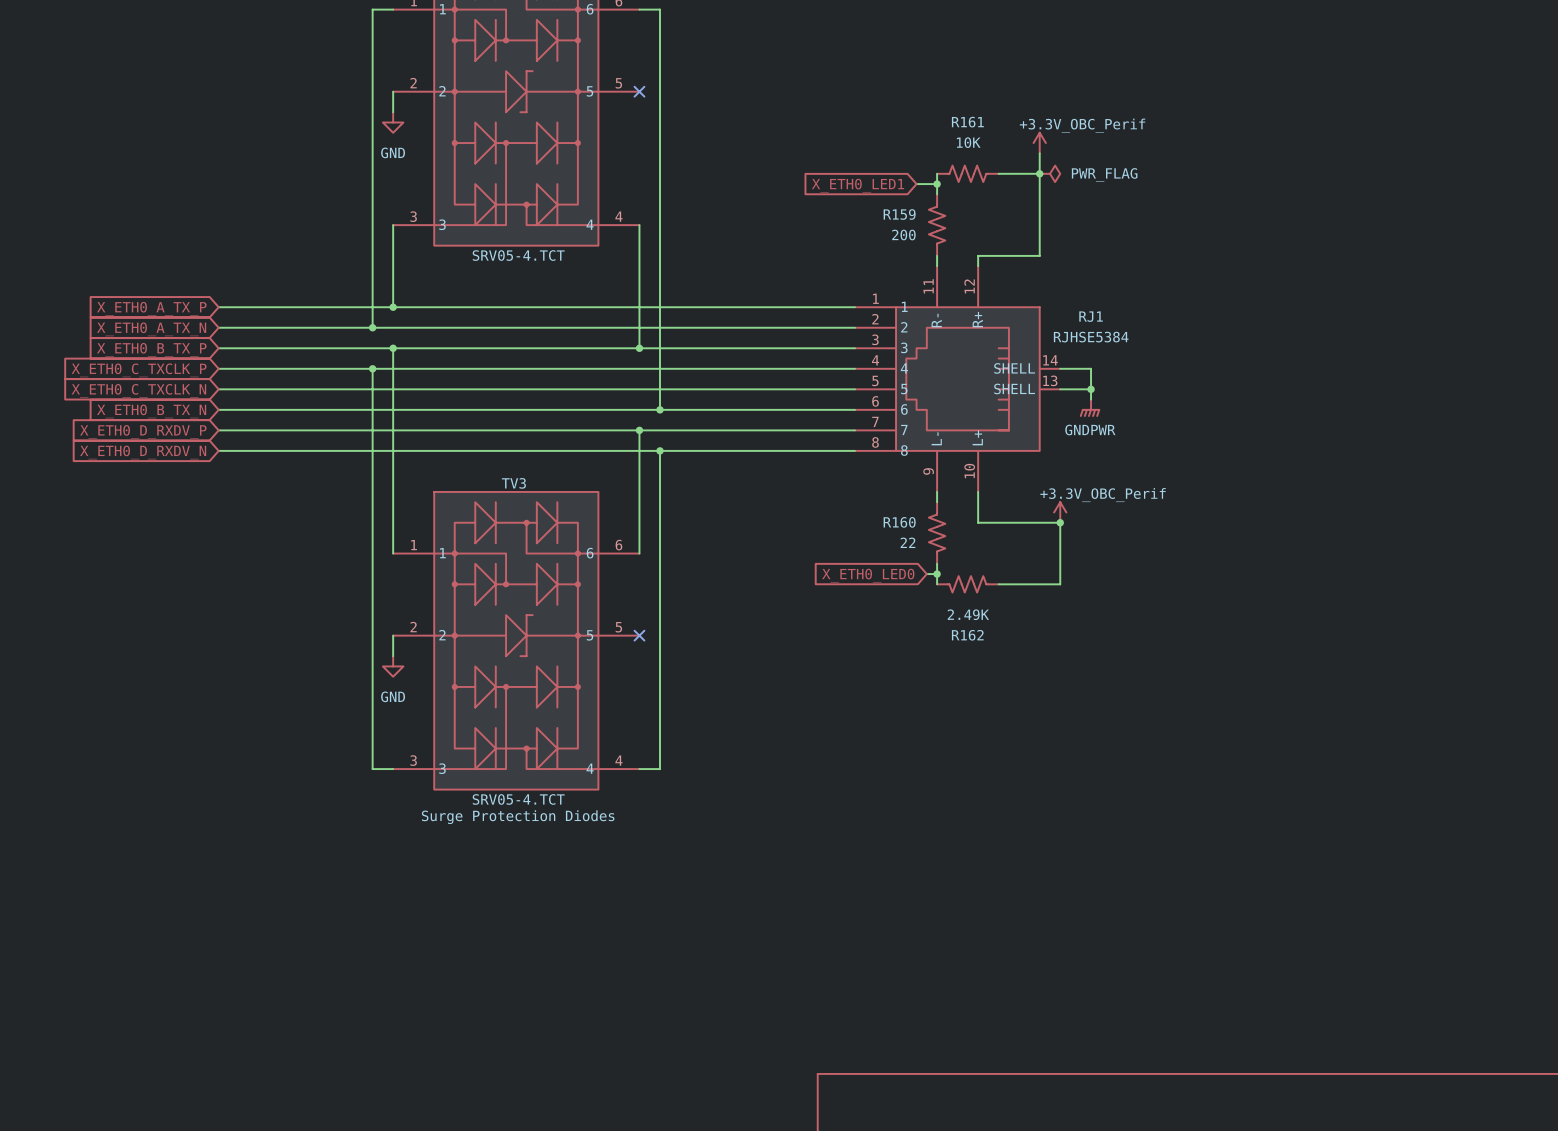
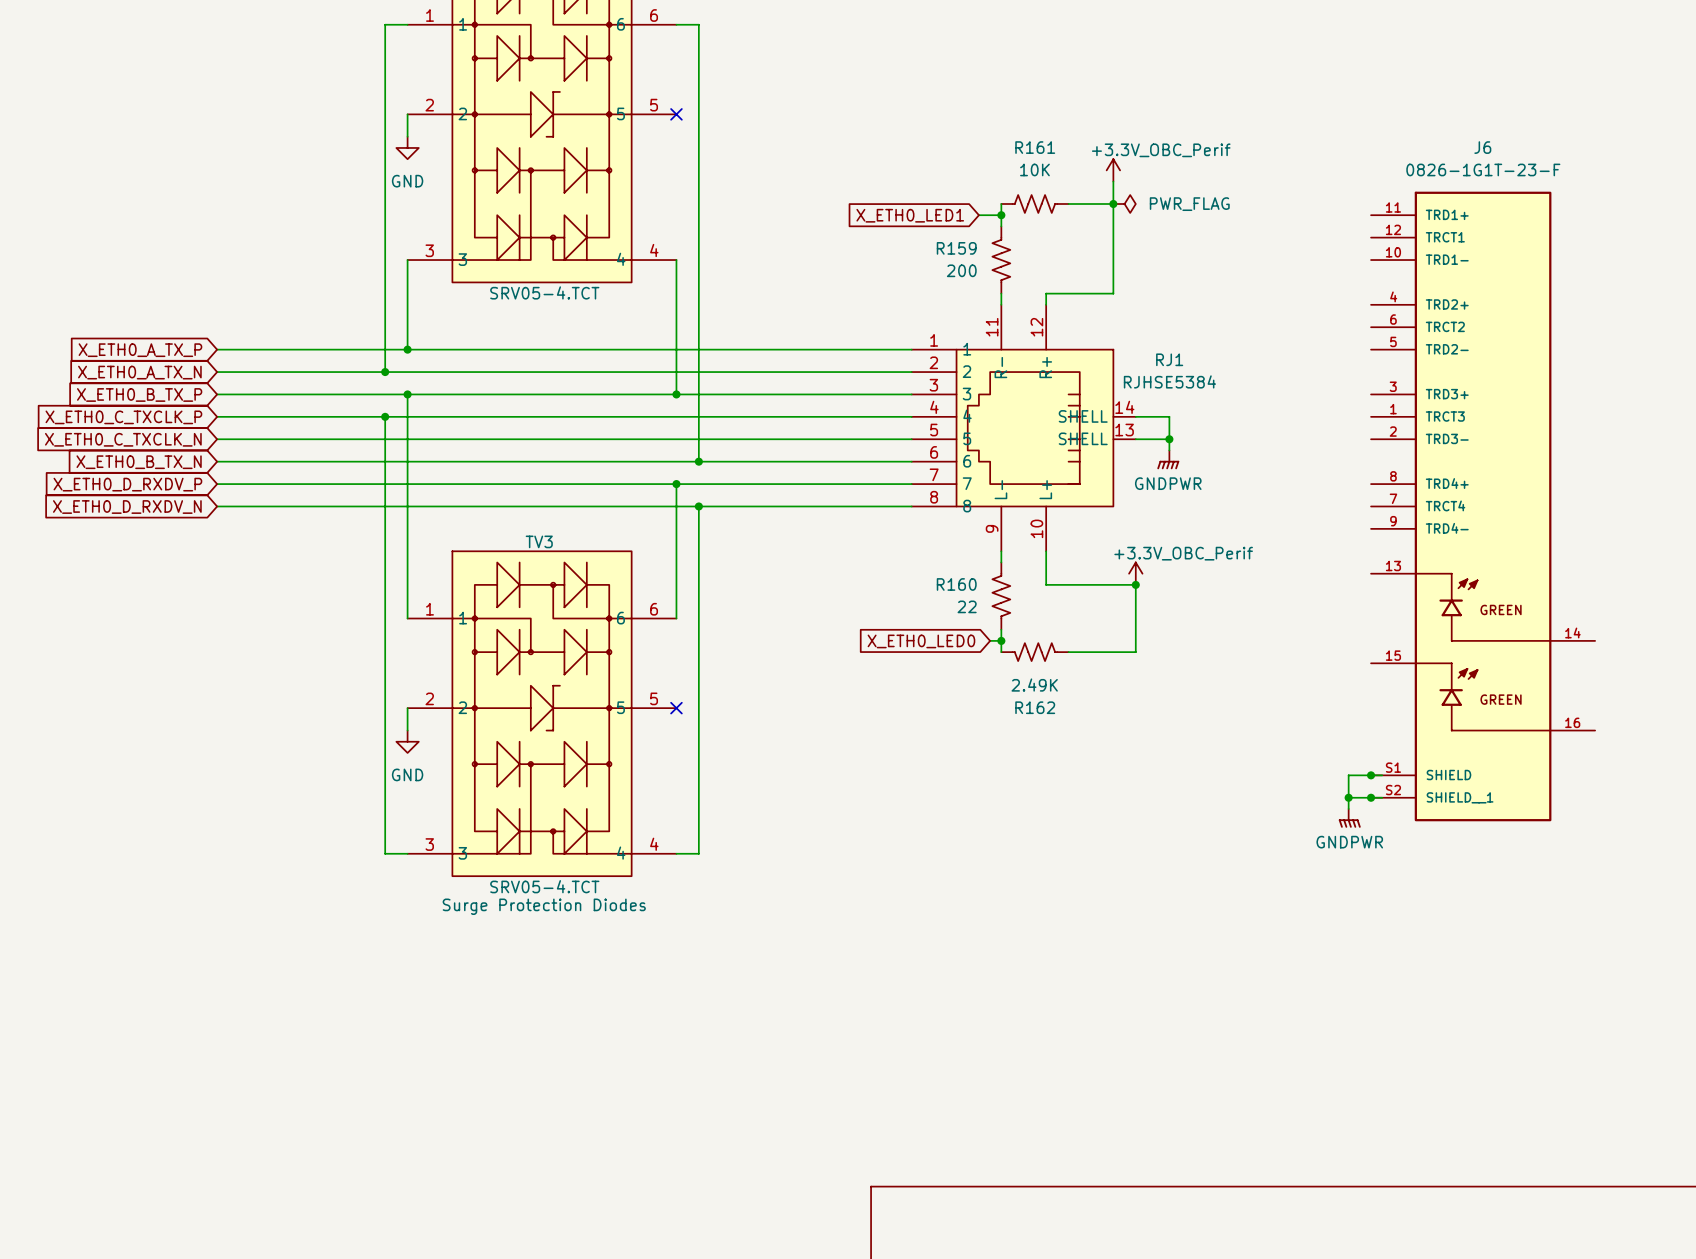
J6: none -> 0826-1G1T-23-F (1483, 506)
junction: none -> (1371, 775)
wire: none -> (1382, 775) (1348, 775) (1348, 808)
wire: none -> (1348, 797) (1382, 797)
junction: none -> (1348, 797)
junction: none -> (1371, 797)
power symbol: none -> GNDPWR (1349, 818)

